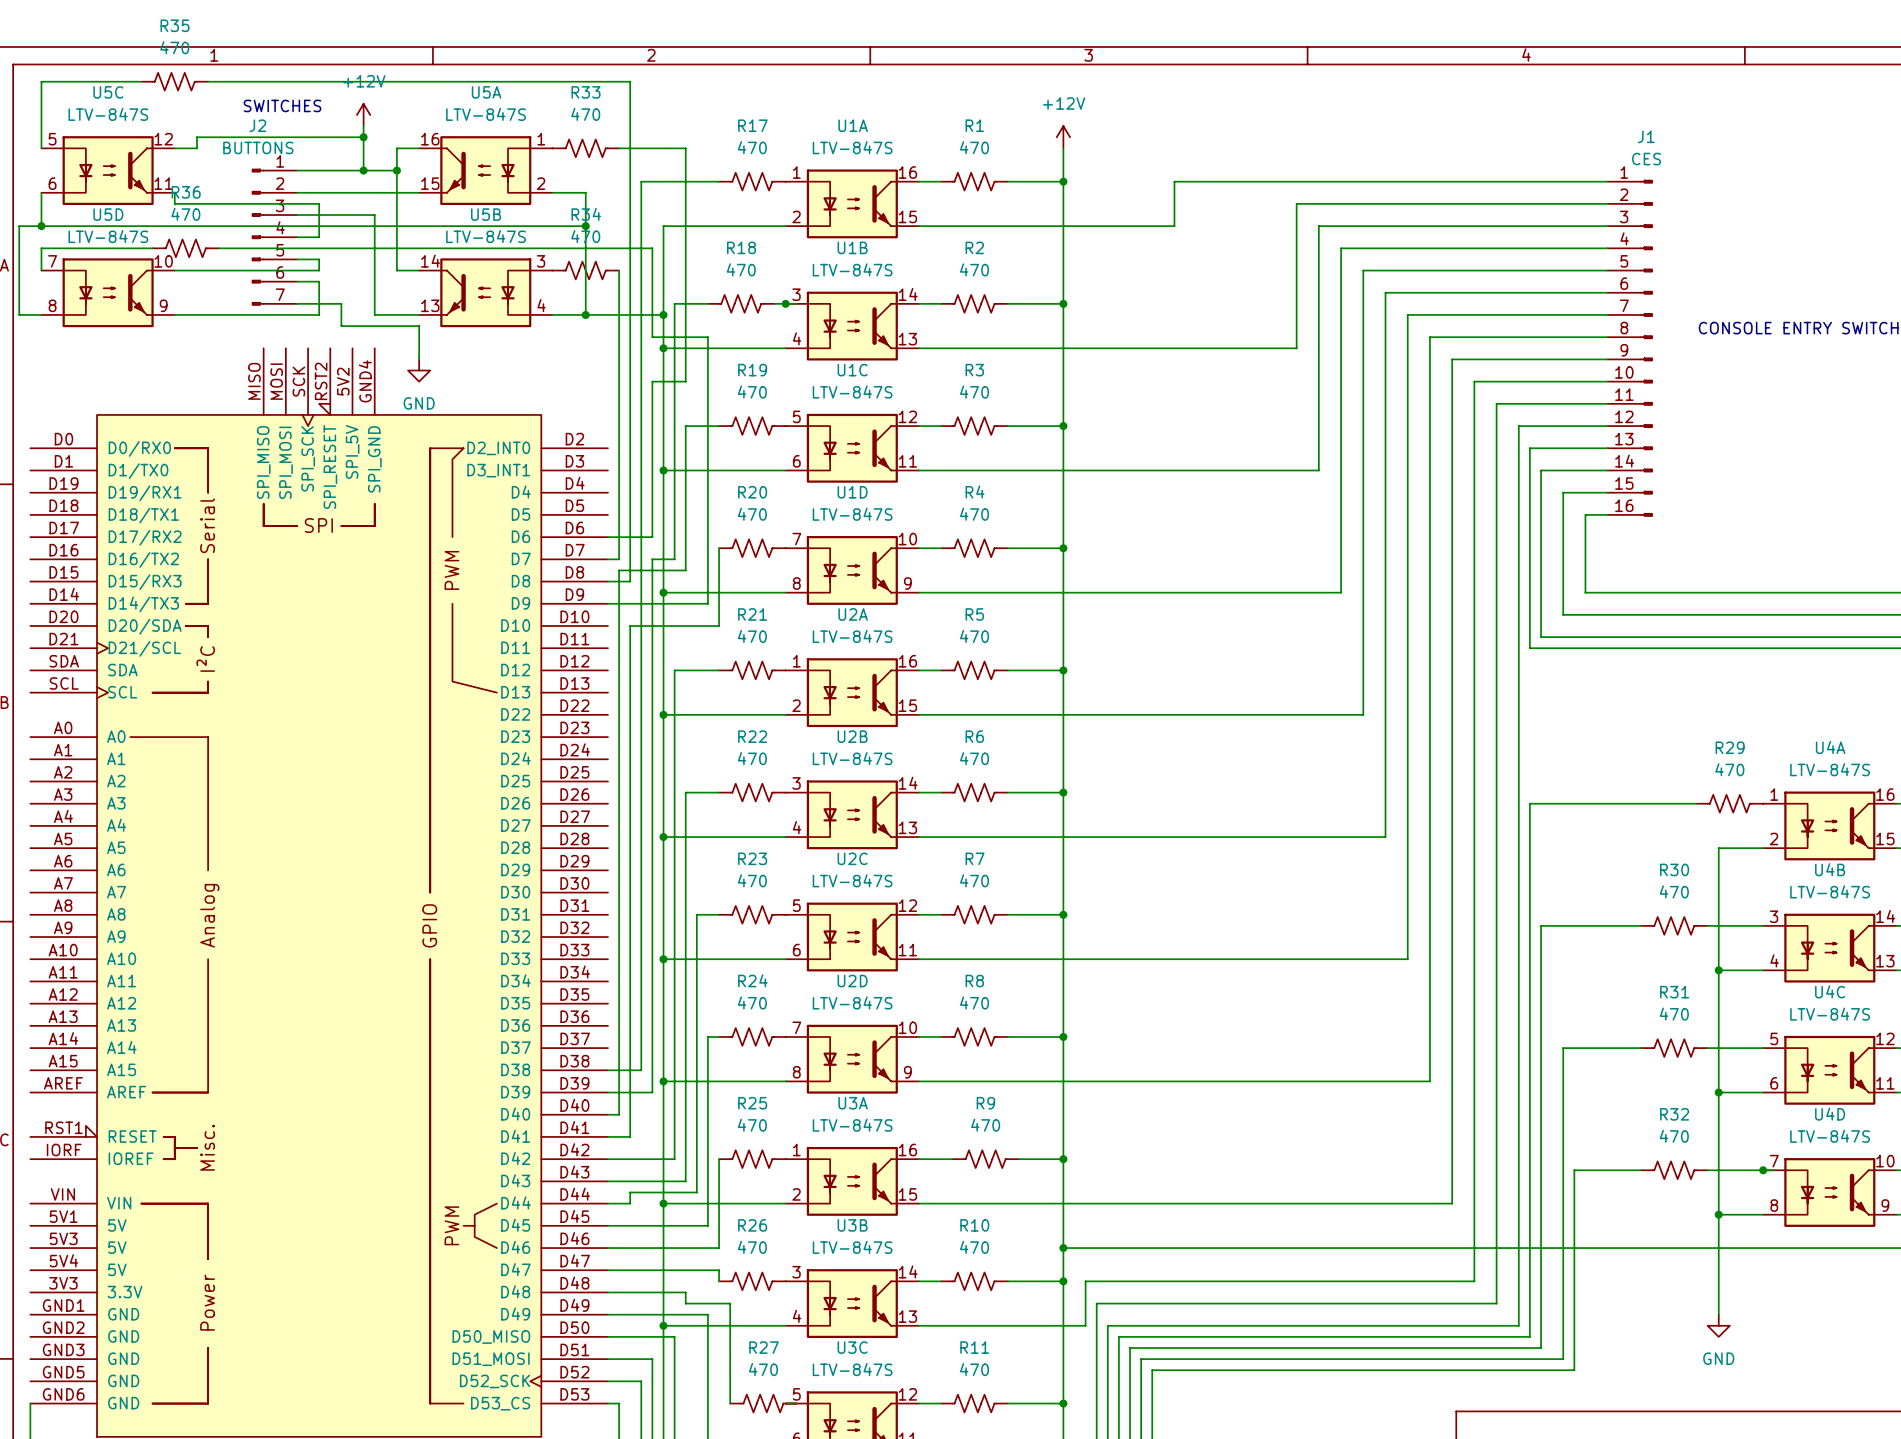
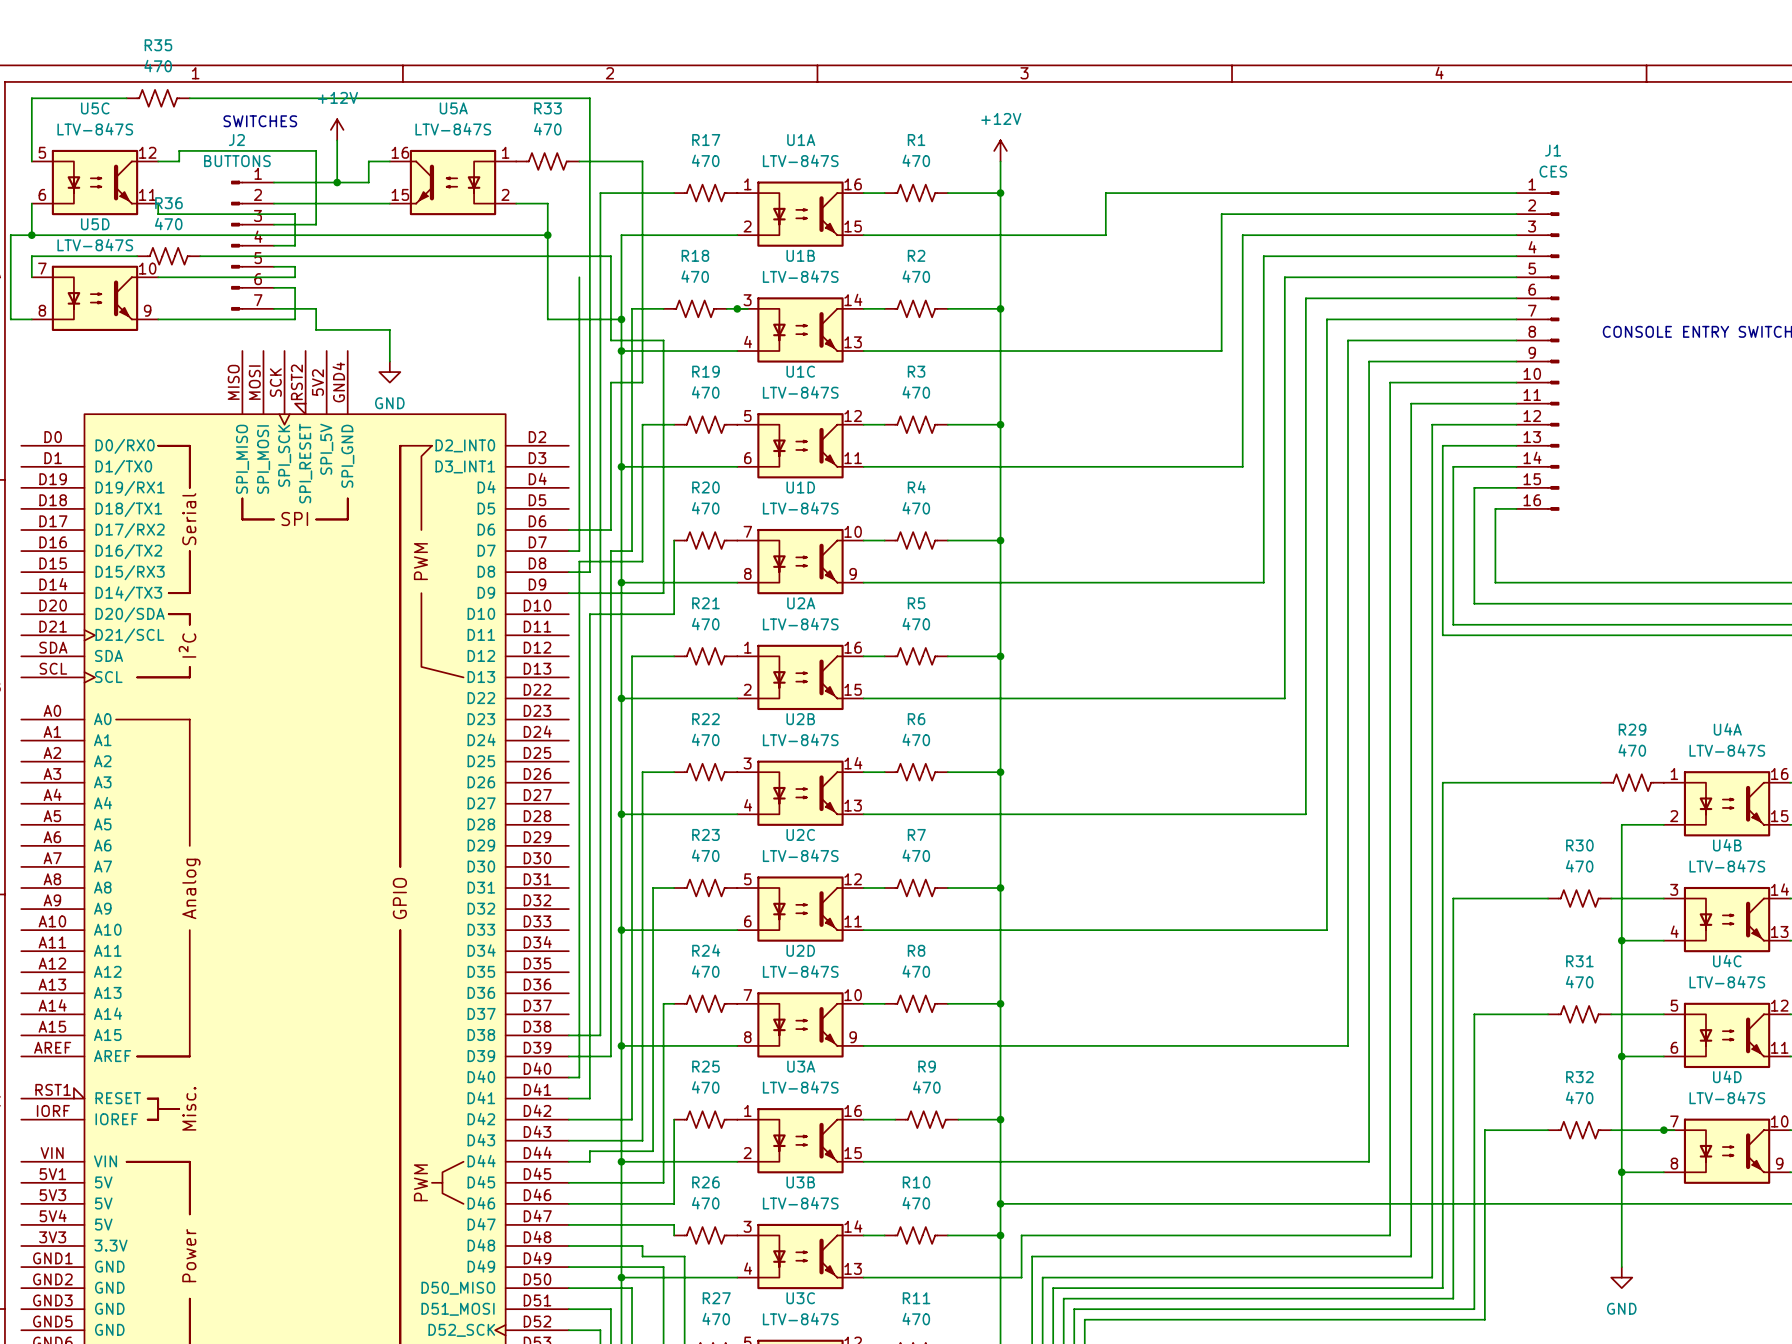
wire: (341, 137) (363, 137) -> (316, 150) (316, 224)
junction: (363, 137) -> none
wire: (396, 170) (396, 270) (419, 270) -> none
junction: (396, 170) -> none
wire: (341, 215) (374, 215) (374, 314) (419, 314) -> none
R34: 470 (585, 270) -> none
U5B: LTV-847S (485, 292) -> none
wire: (552, 314) (585, 314) -> none
junction: (585, 314) -> none

